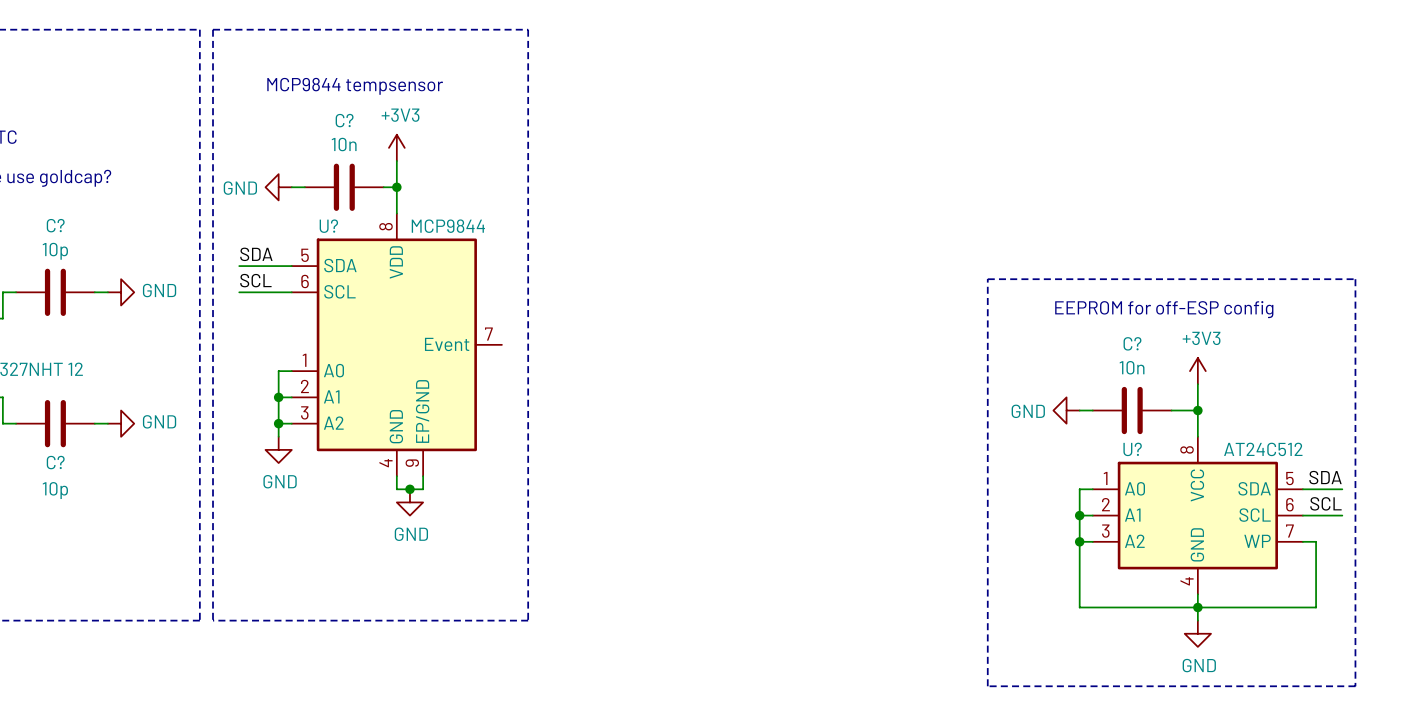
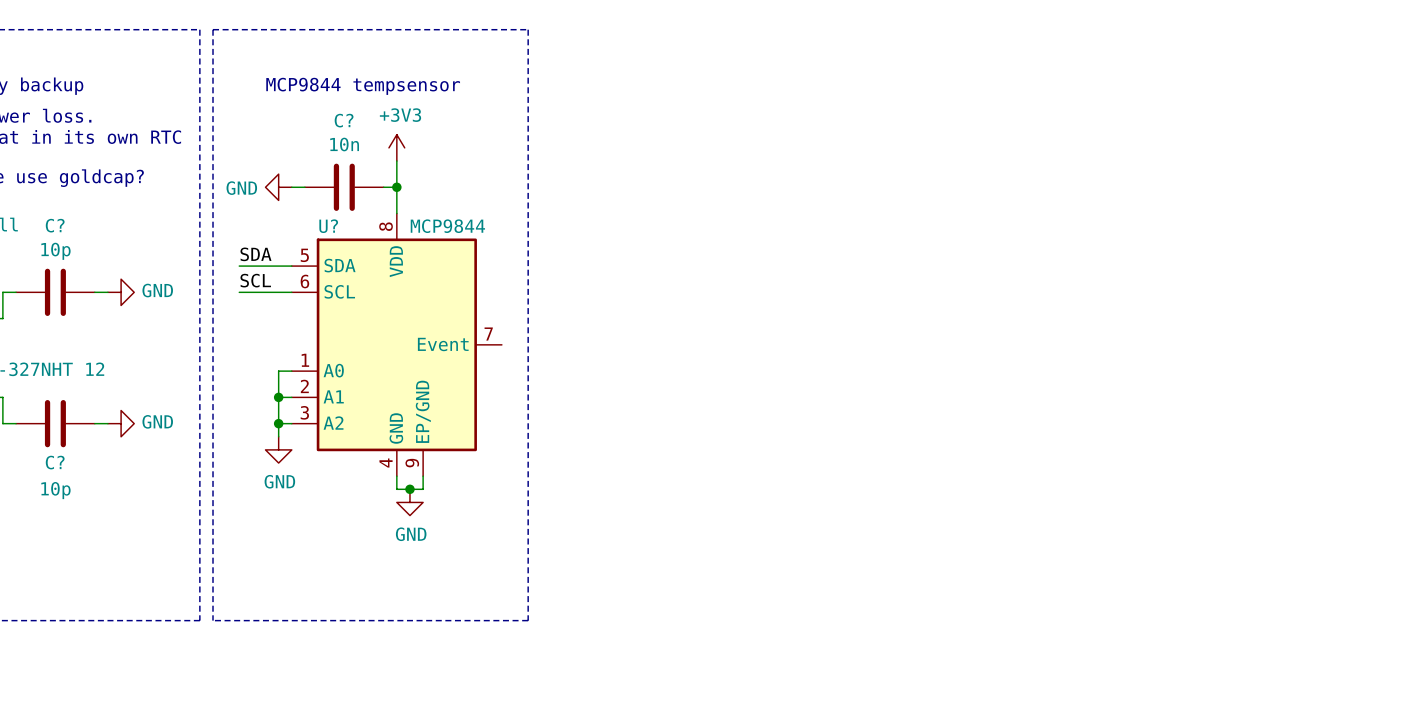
line: (987, 279) (987, 686) (1355, 686) (1355, 279) (987, 279) -> none
text: EEPROM for off-ESP config (1164, 309) -> none
power symbol: +3V3 (1197, 371) -> none
wire: (1197, 384) (1197, 436) -> none
power symbol: GND (1066, 410) -> none
wire: (1079, 410) (1092, 410) -> none
C?: 10n (1132, 410) -> none
wire: (1171, 410) (1197, 410) -> none
junction: (1197, 410) -> none
label: SDA (1325, 477) -> none
wire: (1092, 489) (1079, 489) (1079, 607) (1316, 607) (1316, 541) (1302, 541) -> none
wire: (1302, 489) (1342, 489) -> none
label: SCL (1325, 503) -> none
wire: (1079, 515) (1092, 515) -> none
junction: (1079, 515) -> none
U?: AT24C512 (1197, 515) -> none
wire: (1302, 515) (1342, 515) -> none
wire: (1079, 541) (1092, 541) -> none
junction: (1079, 541) -> none
wire: (1197, 594) (1197, 620) -> none
junction: (1197, 607) -> none
power symbol: GND (1197, 633) -> none

